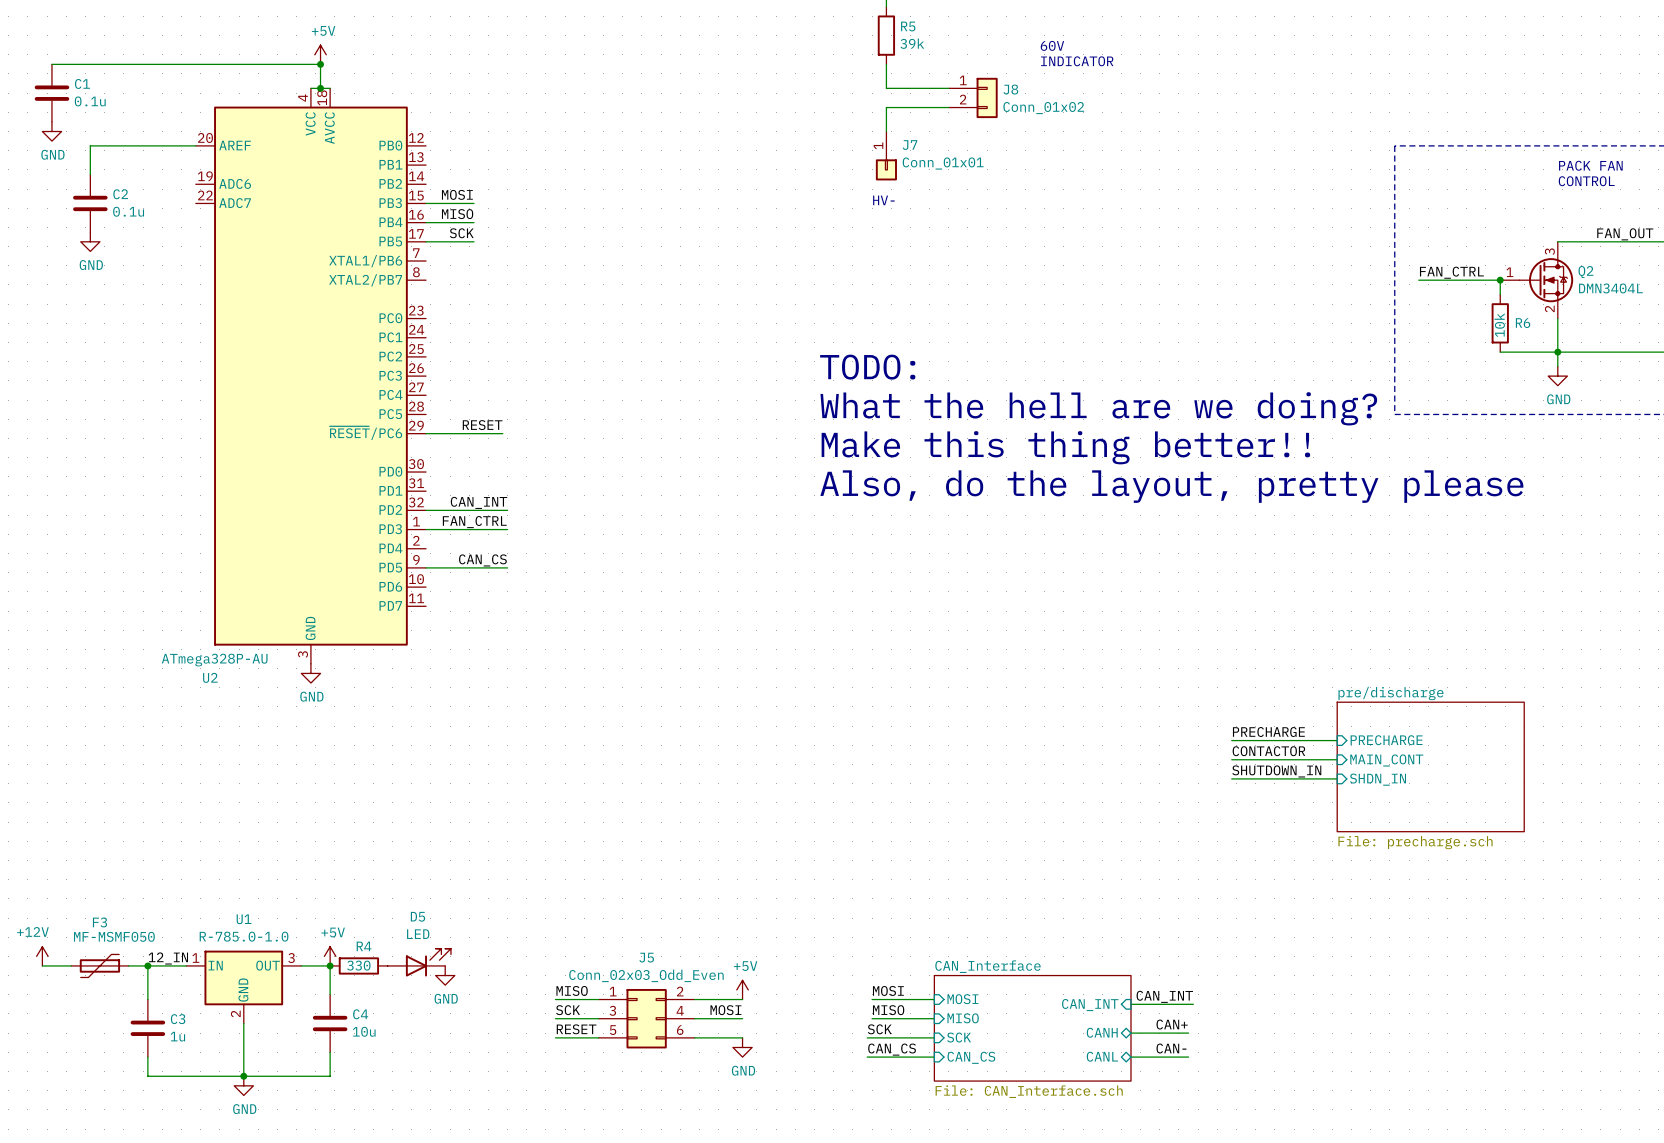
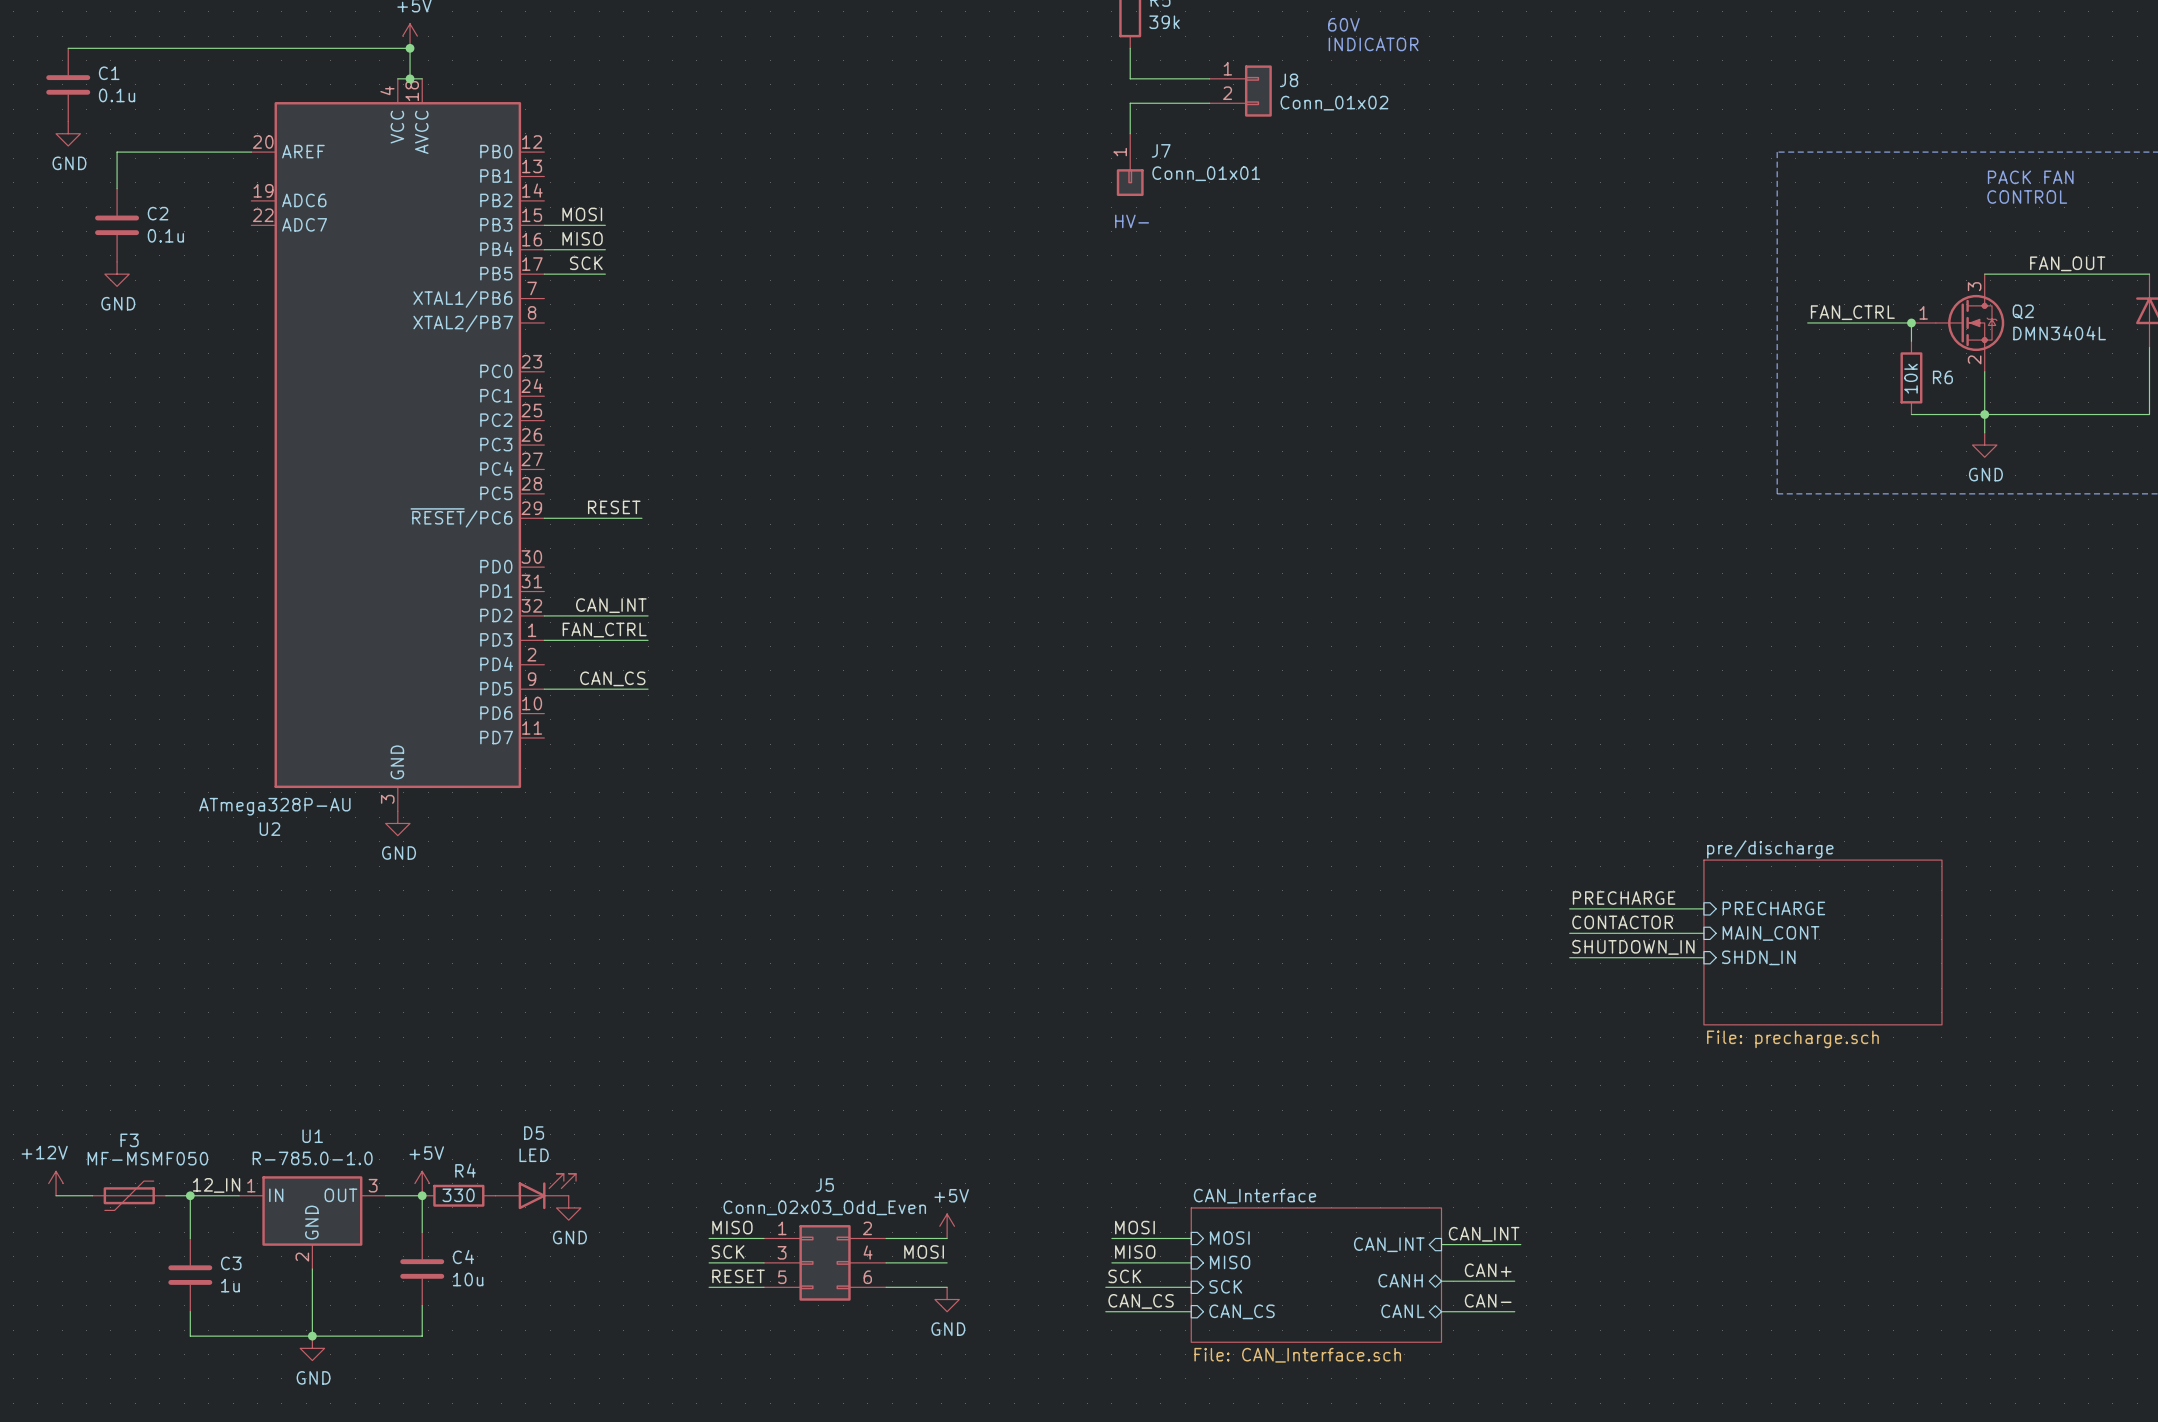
text: TODO: (867, 367) -> none
text: What the hell are we doing? (1098, 408) -> none
text: Make this thing better!! (1065, 447) -> none
text: Also, do the layout, pretty please (1171, 486) -> none

